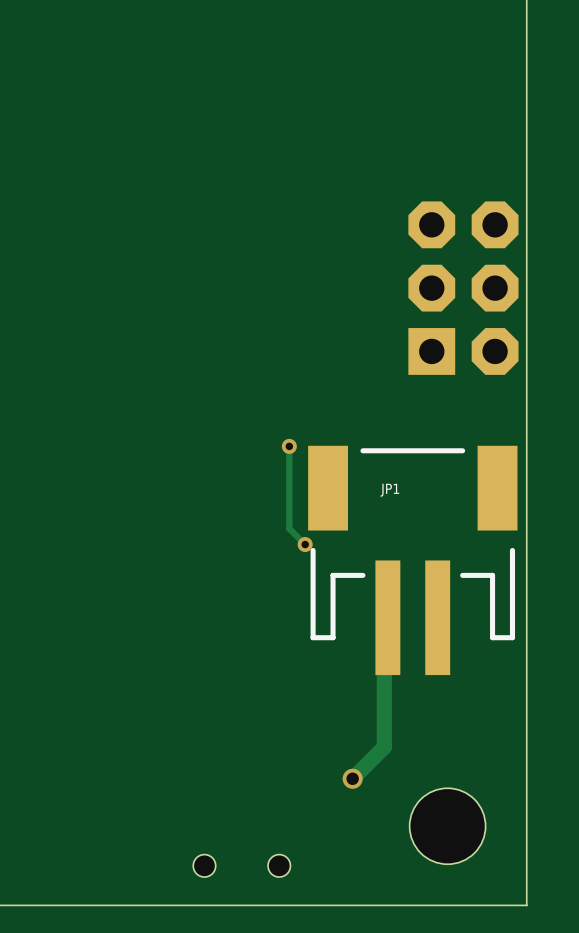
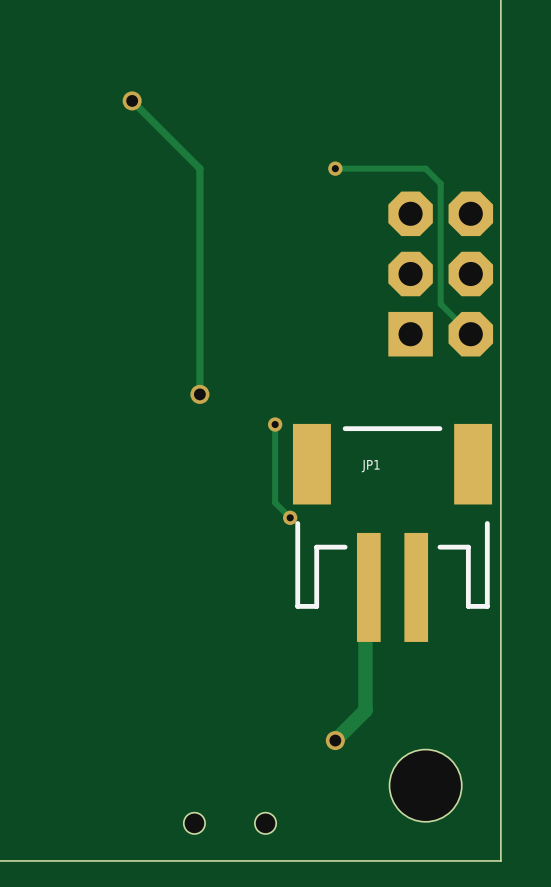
track: none -> (132, 100) (199, 168) (199, 394)
via: none -> (132, 100)
track: none -> (335, 168) (425, 168) (440, 183) (440, 304) (470, 334)
via: none -> (335, 168)
via: none -> (199, 394)

